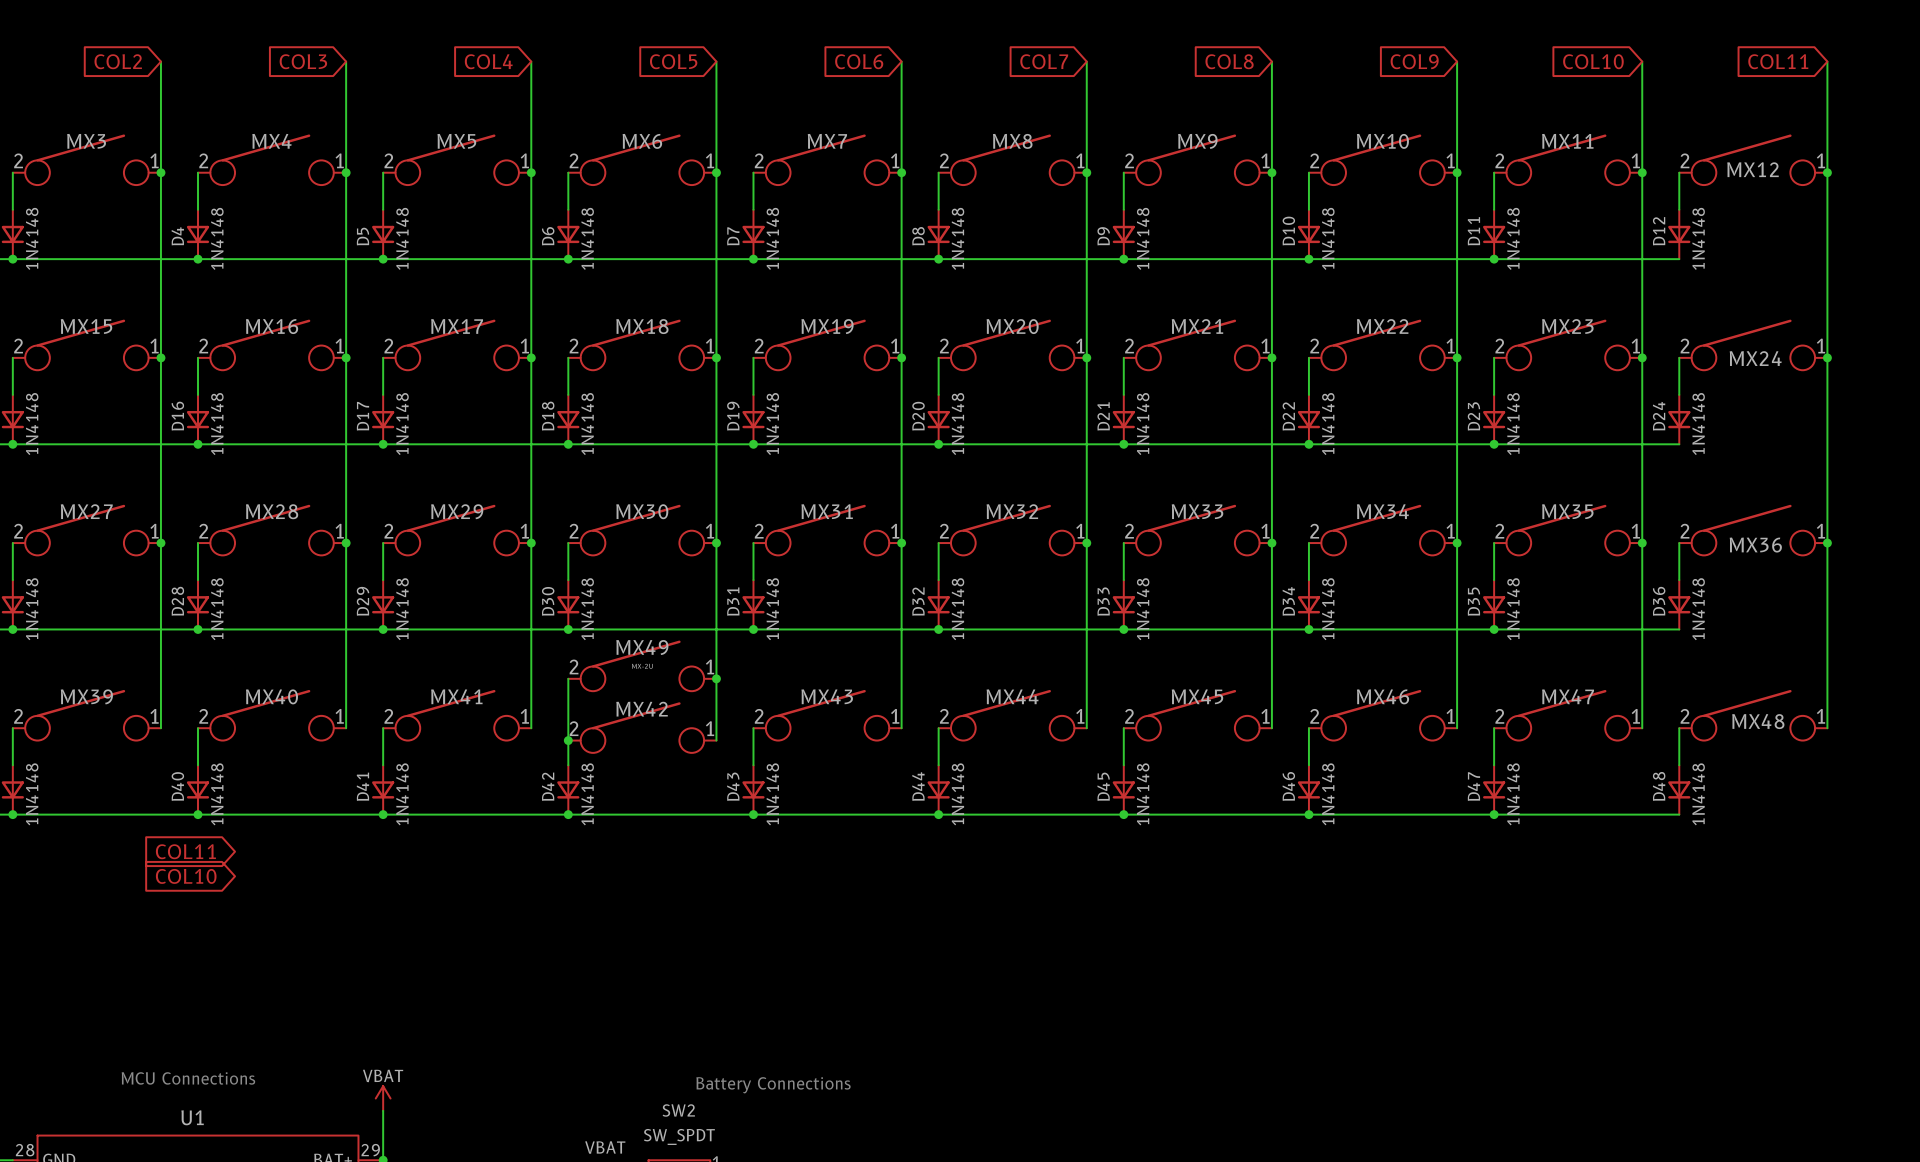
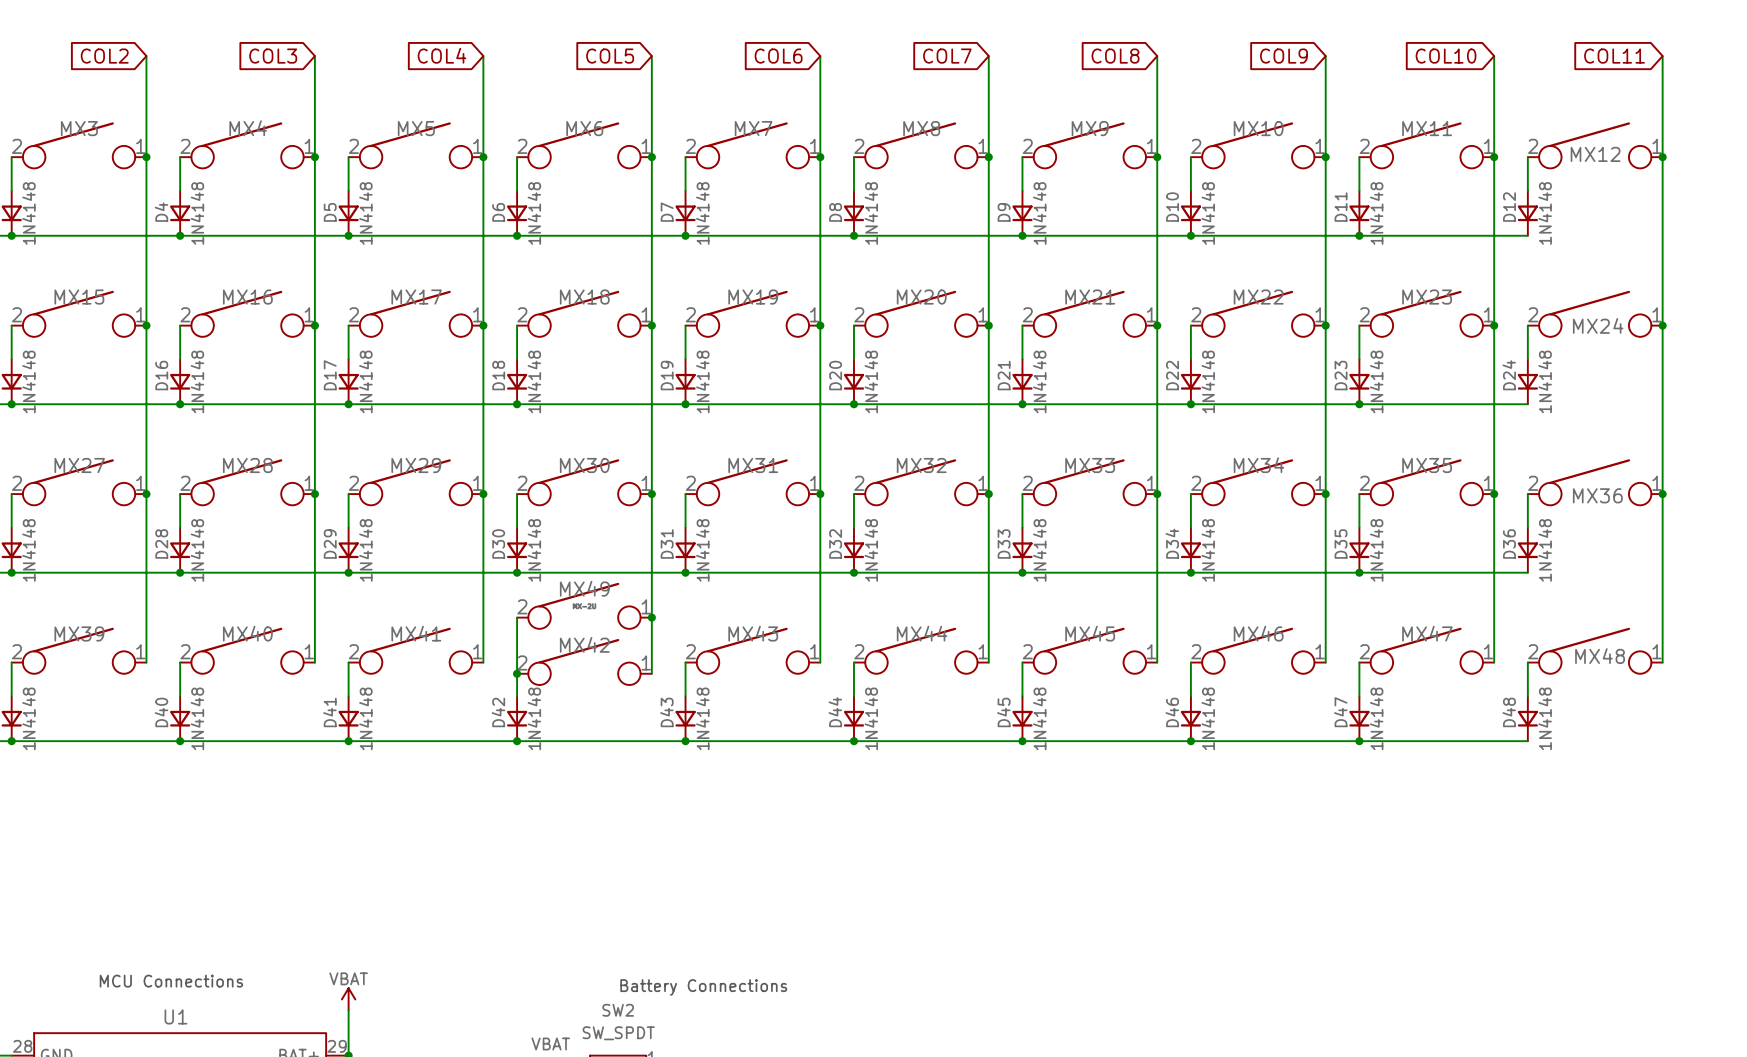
global label: COL11 (185, 851) -> none
global label: COL10 (186, 876) -> none

